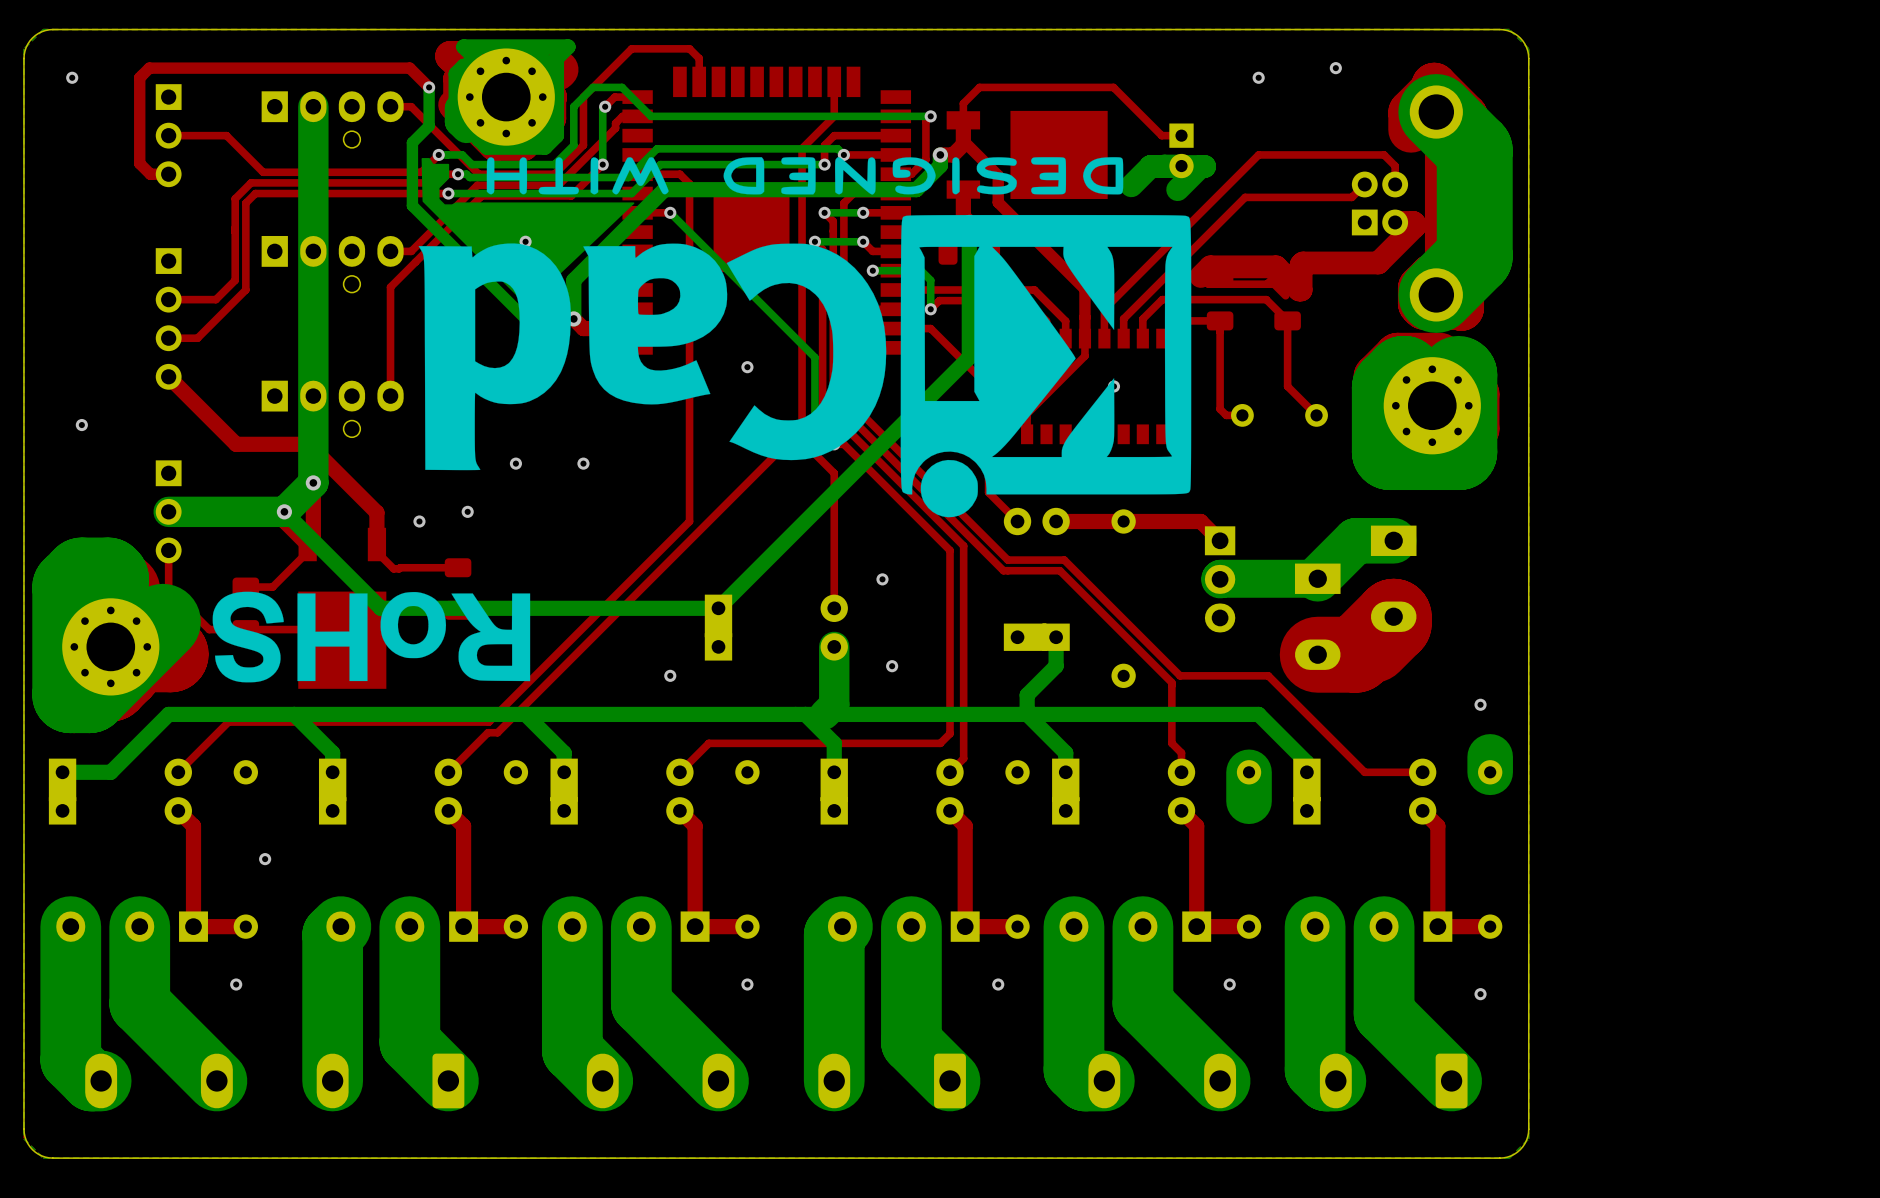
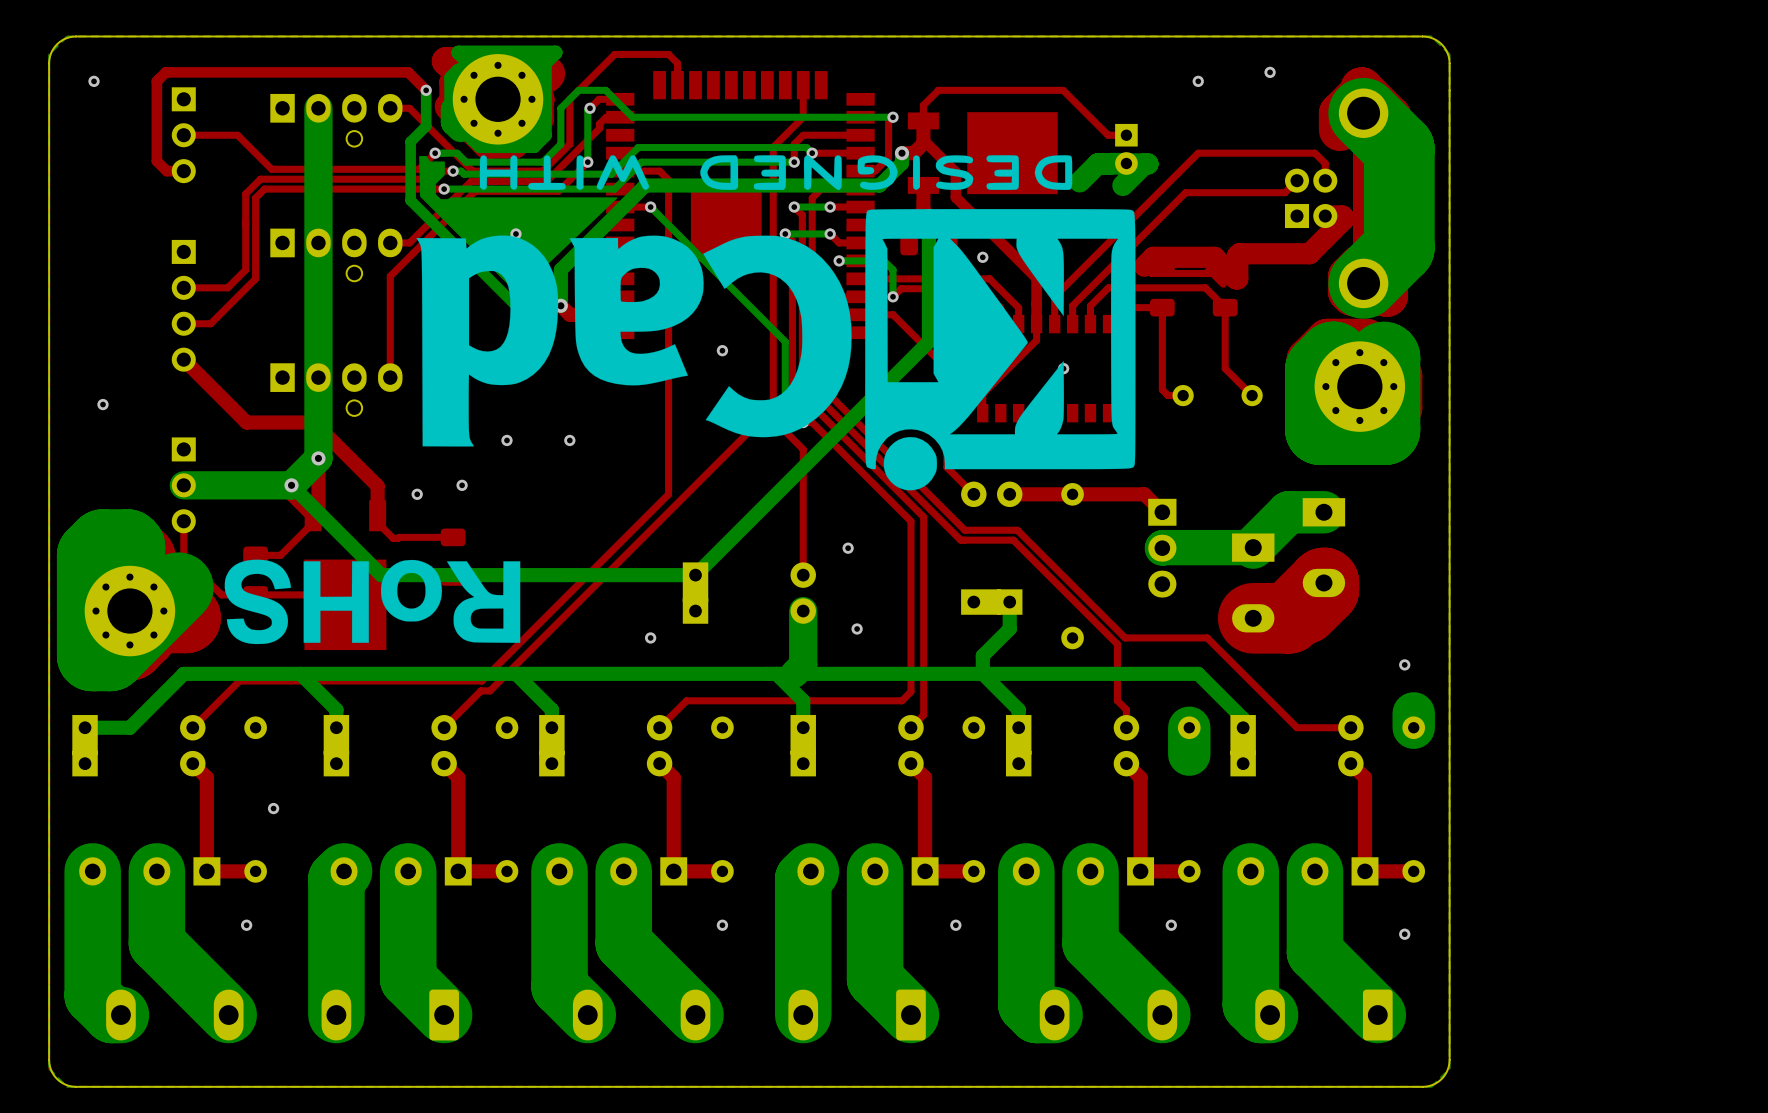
via: none -> (982, 257)

